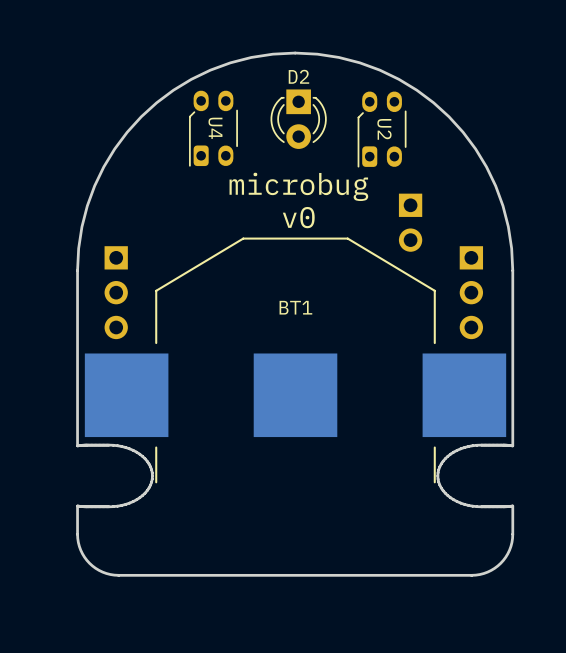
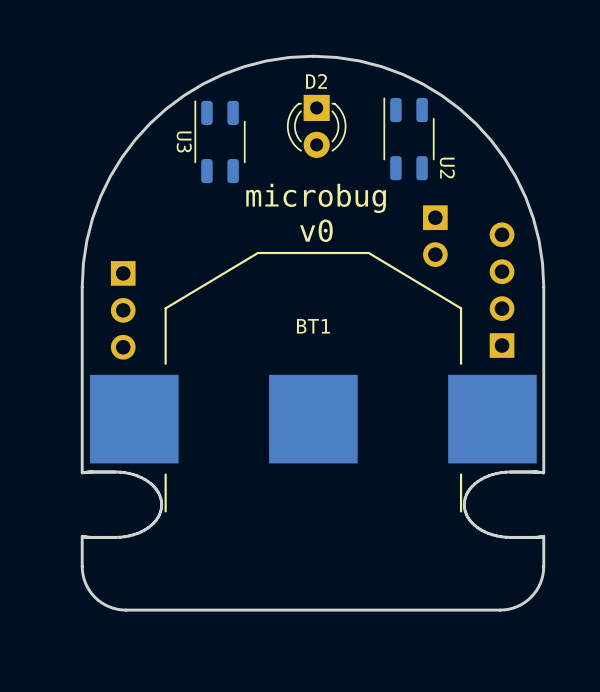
U2 footprint: [357, 91, 407, 168] -> [383, 97, 435, 181]
U4: (213, 128) -> none
U2 name position: U2 (384, 129) -> U2 (447, 168)
U3: none -> (220, 141)
part: none -> (502, 290)
part: (471, 292) -> none

